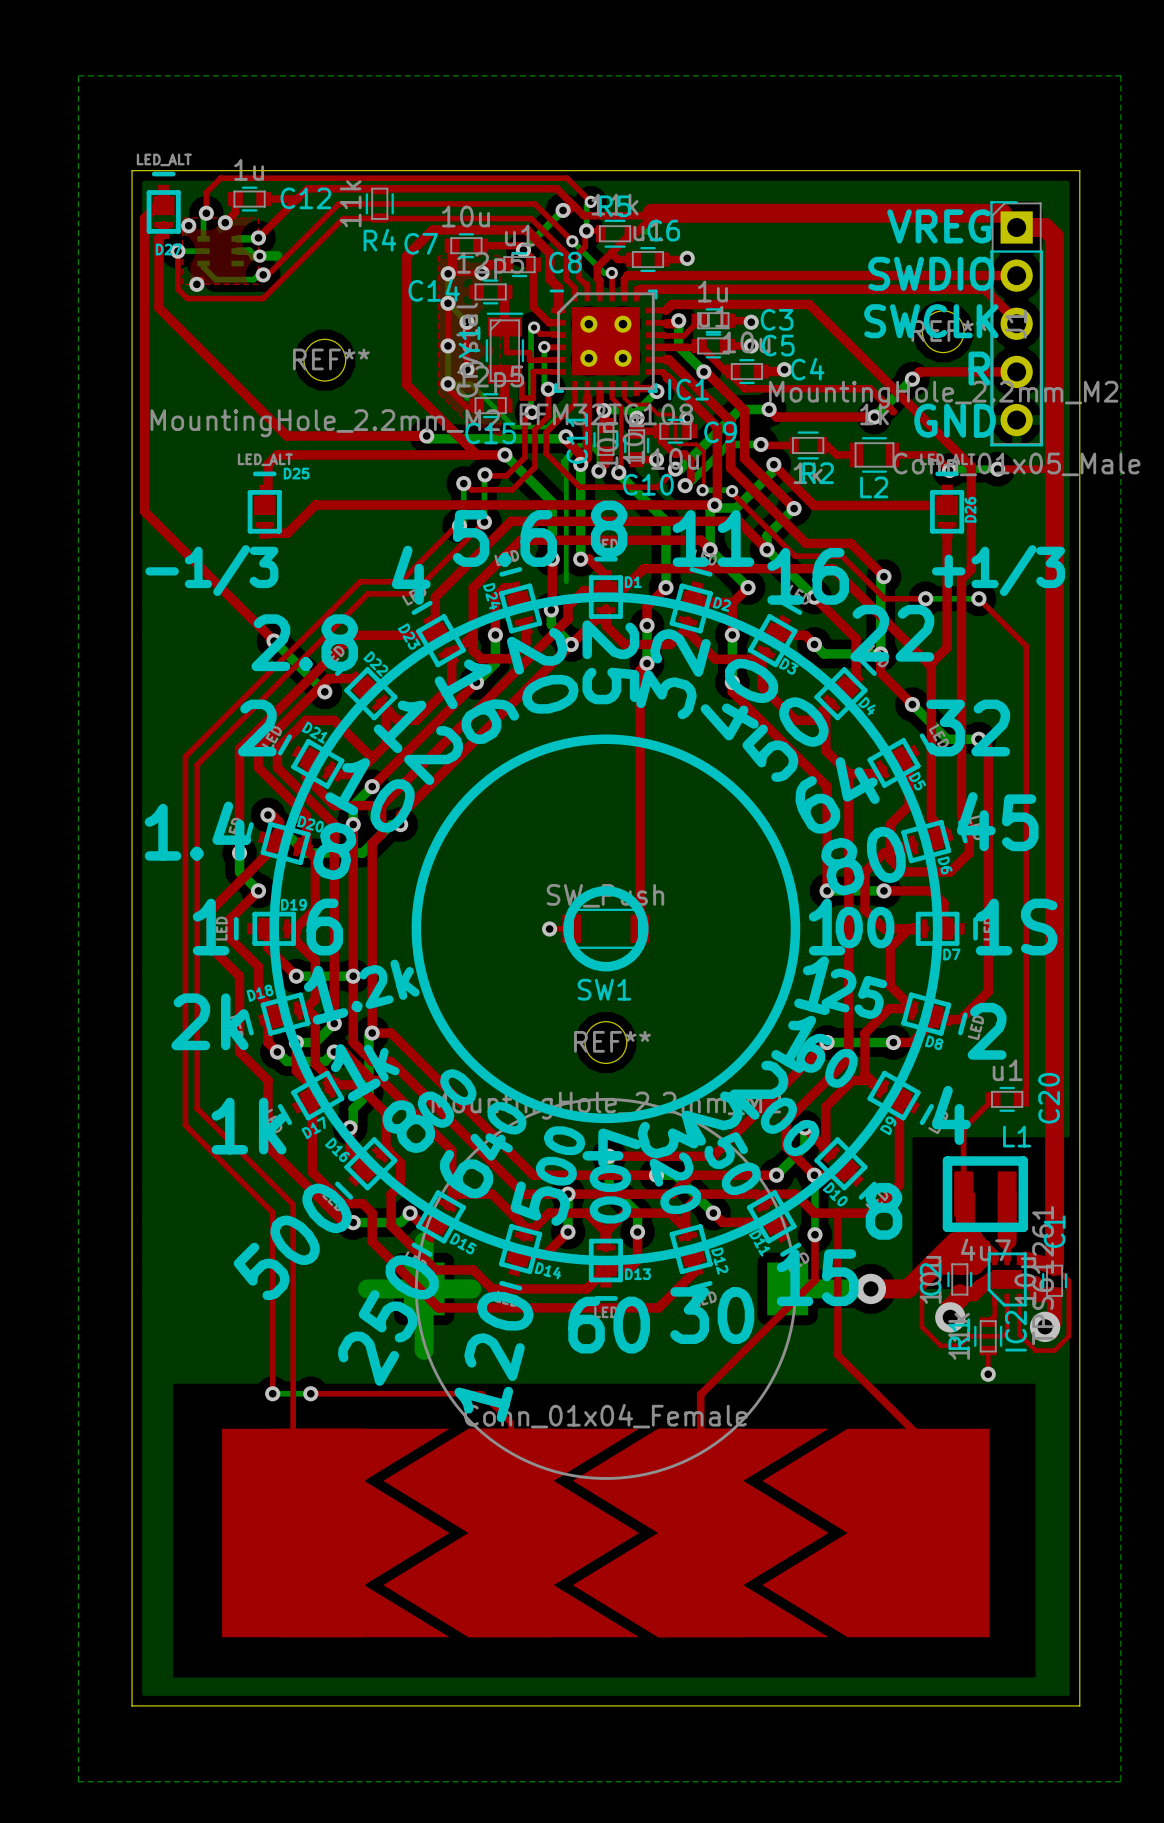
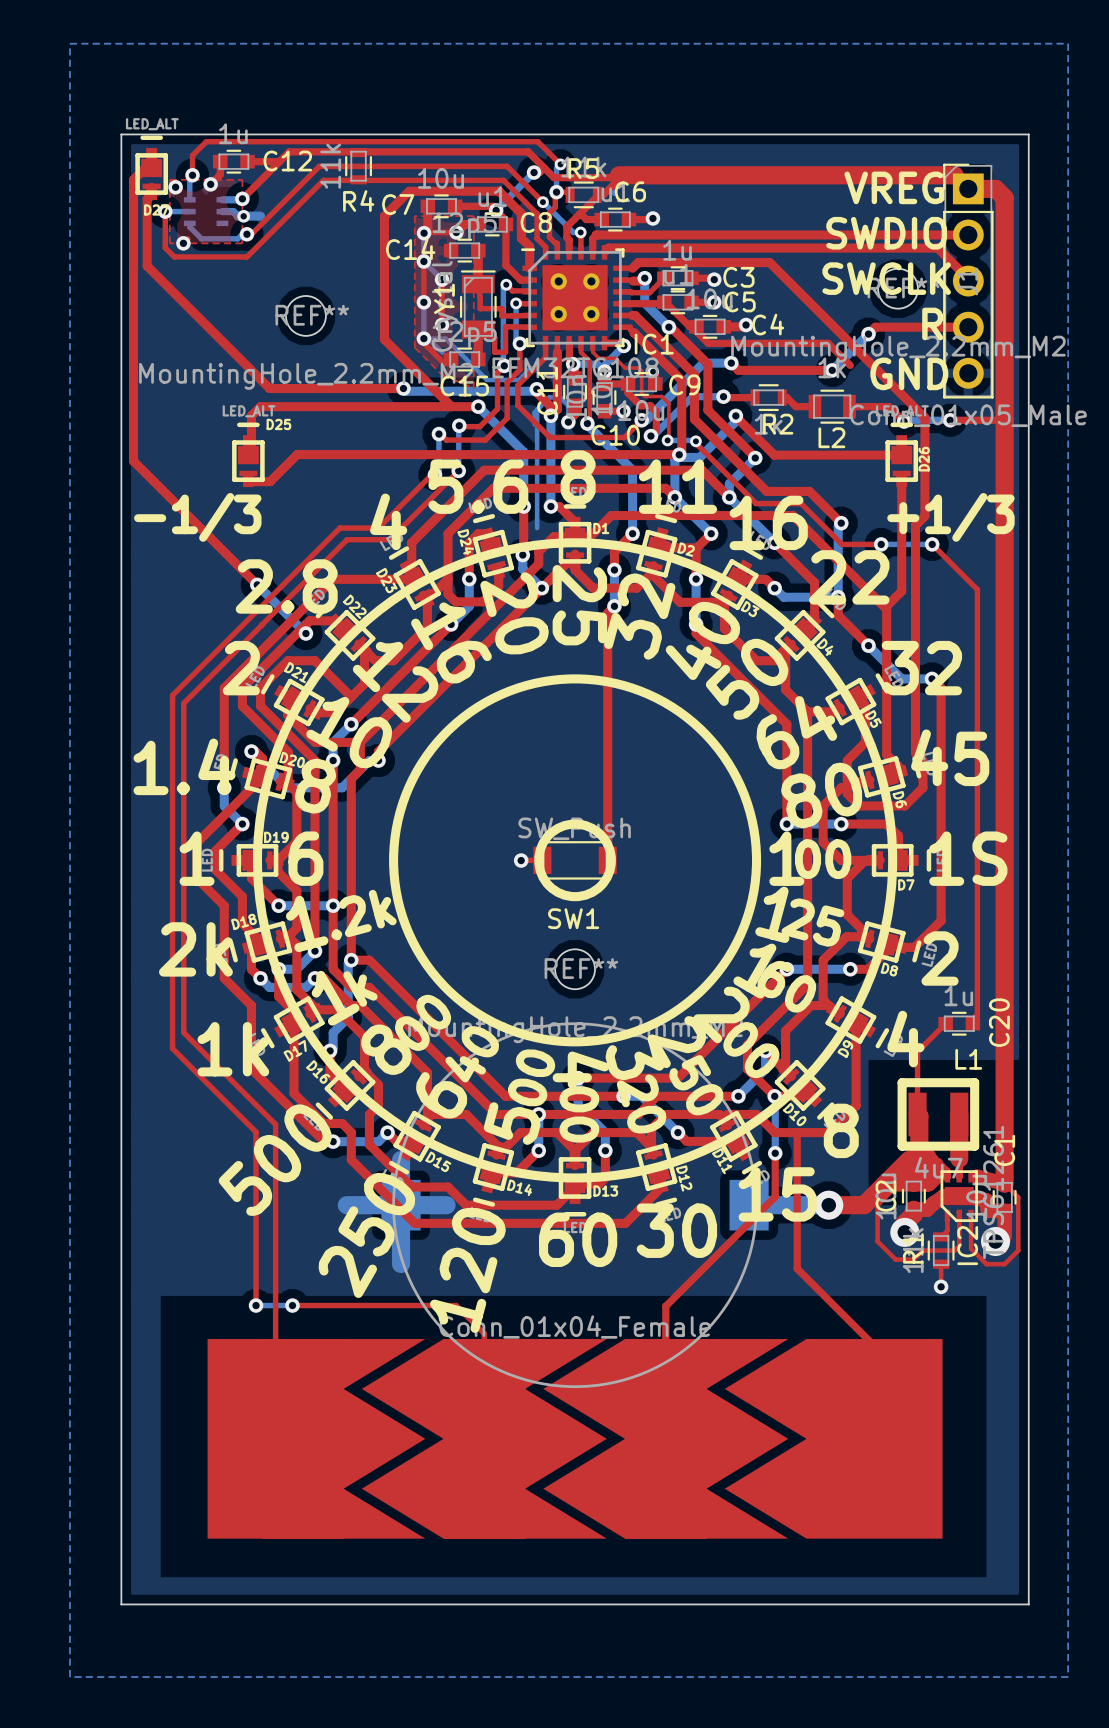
C20 value: u1 (1007, 1070) -> 1u (958, 995)

